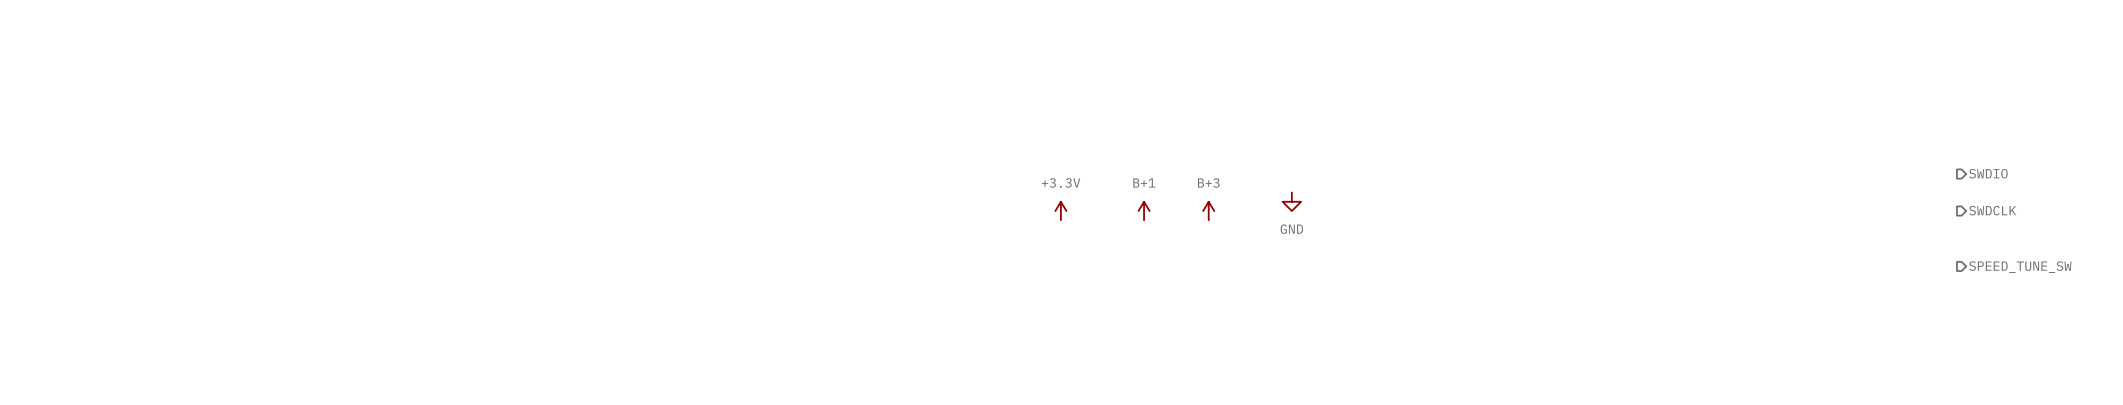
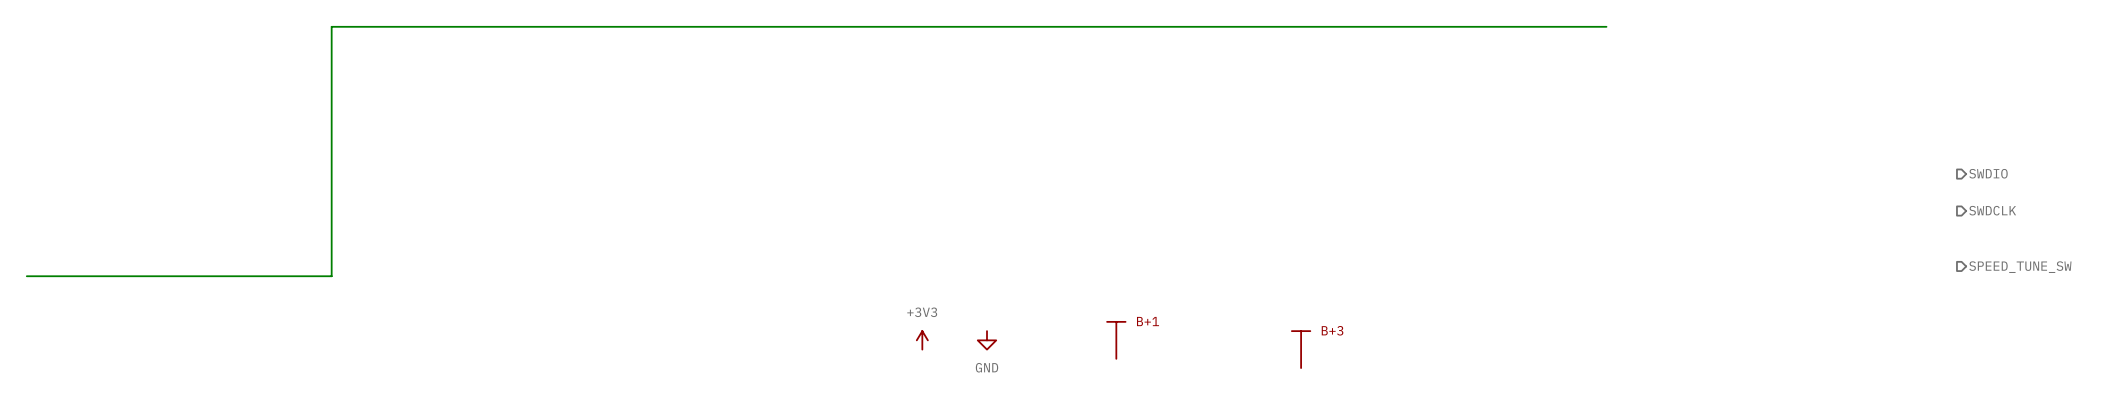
wire: none -> (1606, 26) (331, 26) (331, 276) (26, 276)
power symbol: GND (1291, 201) -> none
power symbol: +3.3V (1060, 211) -> none
power symbol: B+1 (1144, 211) -> none
power symbol: B+3 (1208, 211) -> none
power symbol: none -> +3V3 (922, 340)
power symbol: none -> GND (987, 340)
power symbol: none -> (1116, 340)
power symbol: none -> (1301, 349)

